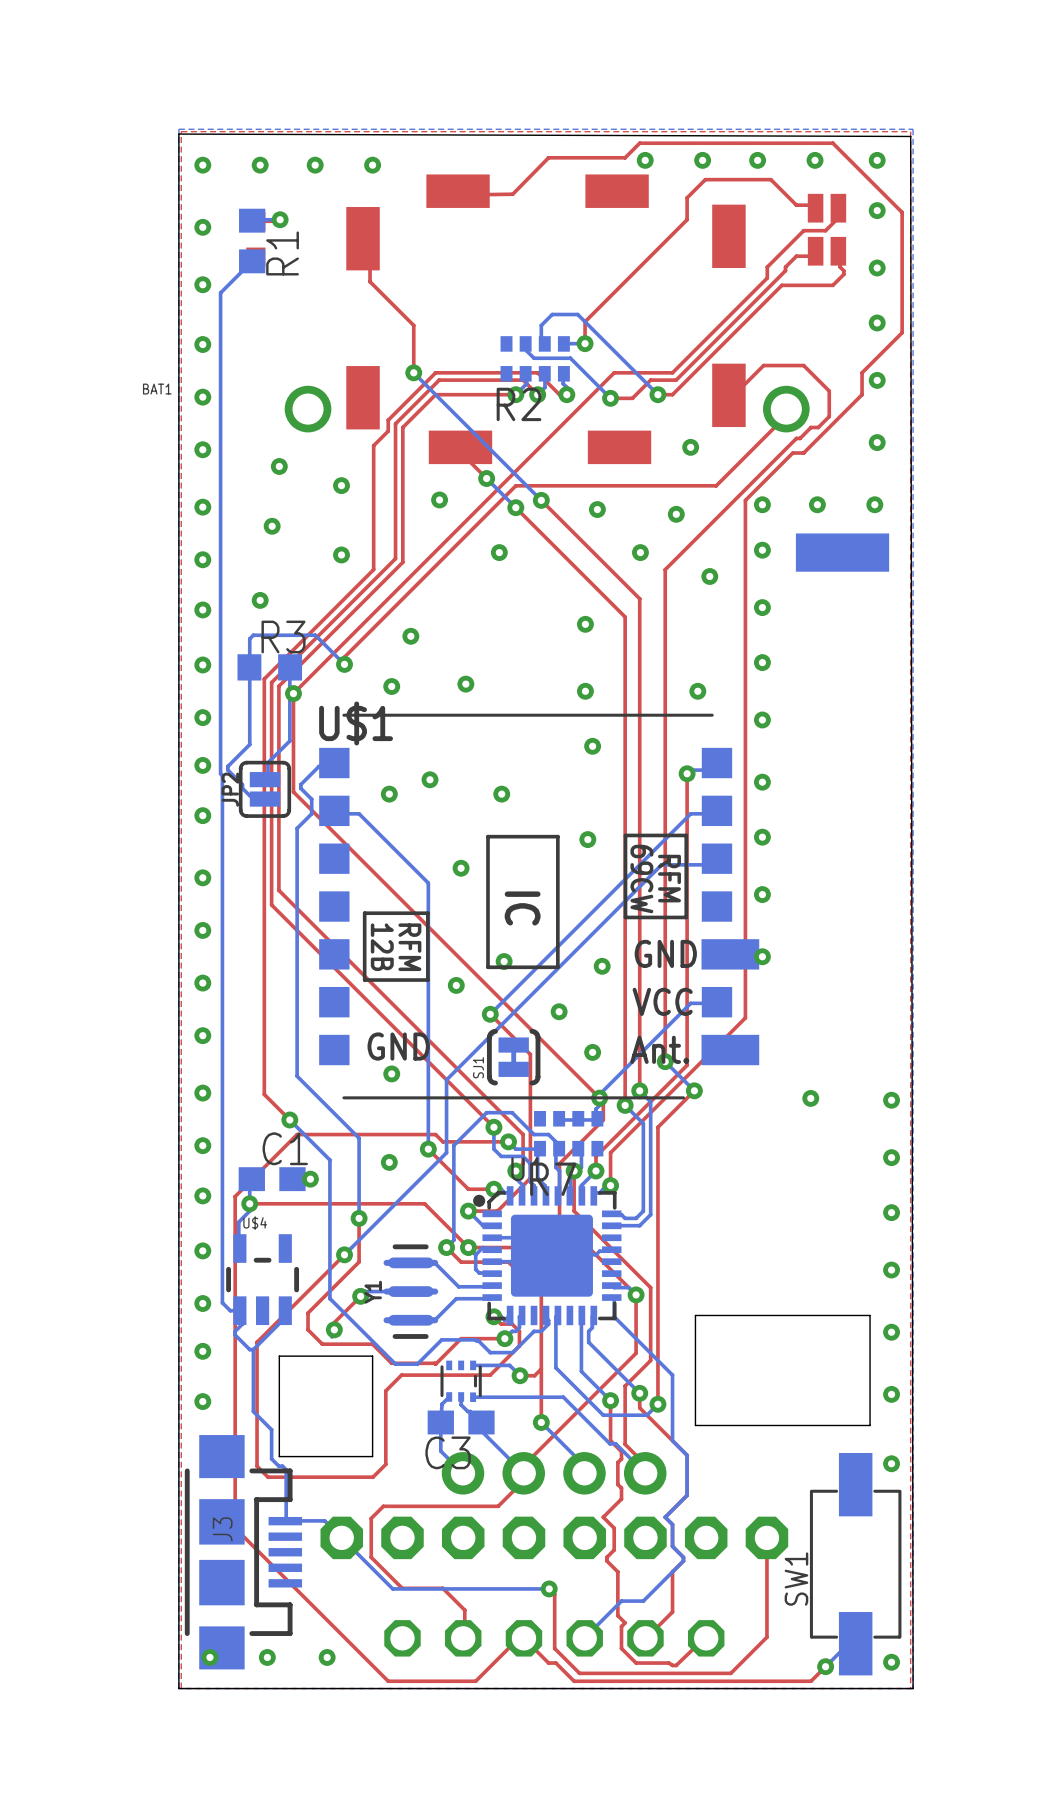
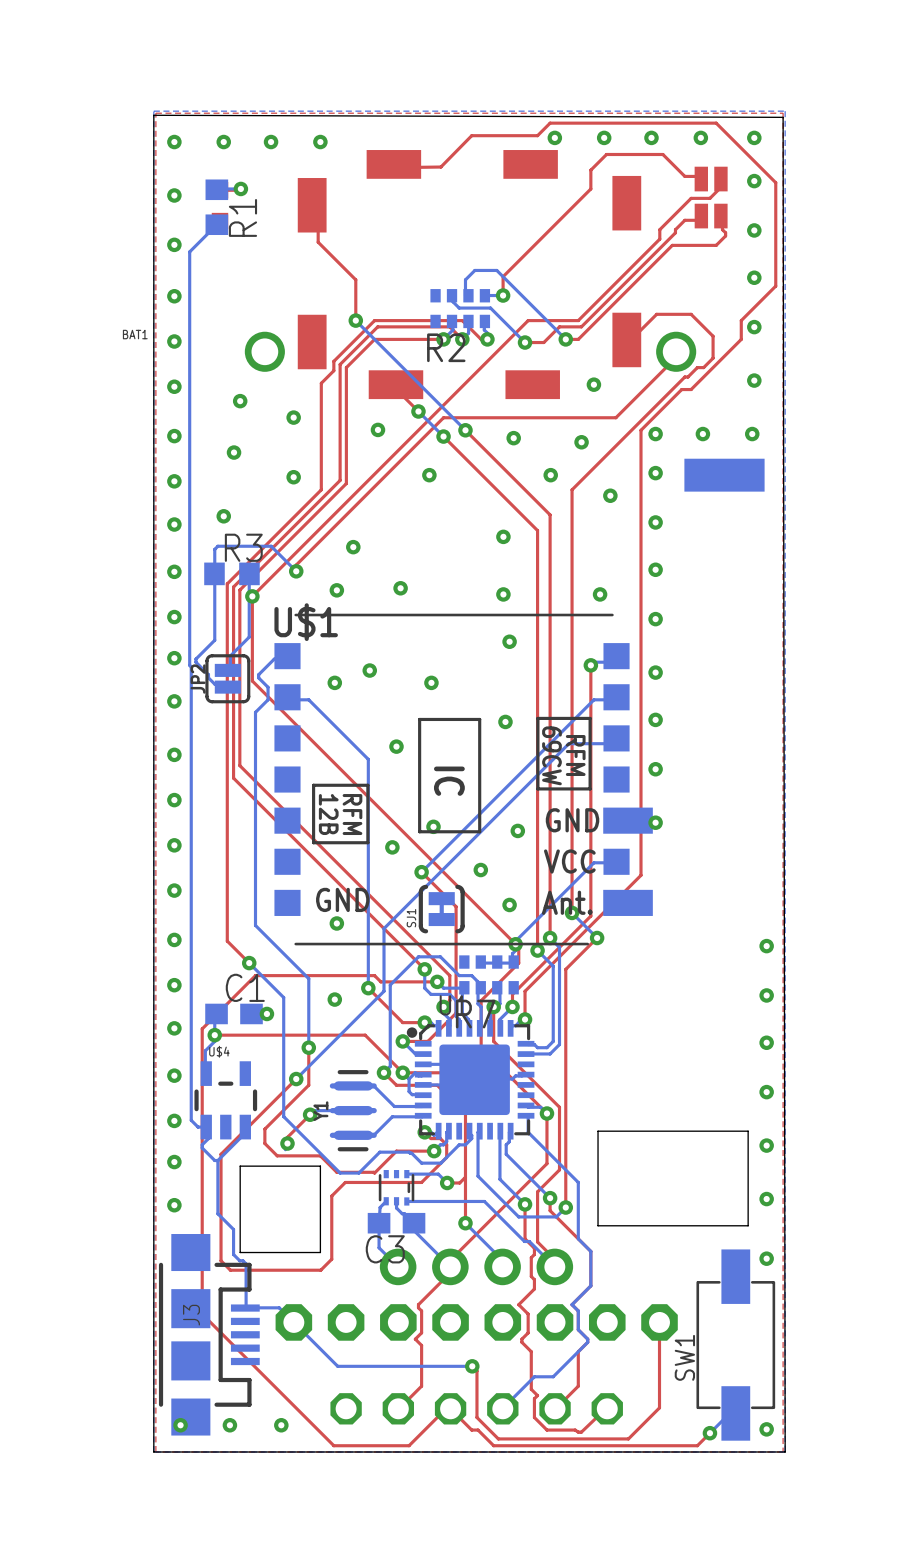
via: (810, 1098) -> none
top track: (523, 1473) (523, 1480) (498, 1506) (383, 1506) (371, 1518) (371, 1557) (402, 1588) (442, 1588) (464, 1610) (464, 1637) -> (449, 1273) (418, 1304) (421, 1310) (421, 1332) (415, 1339) (421, 1345) (421, 1386) (399, 1408)

